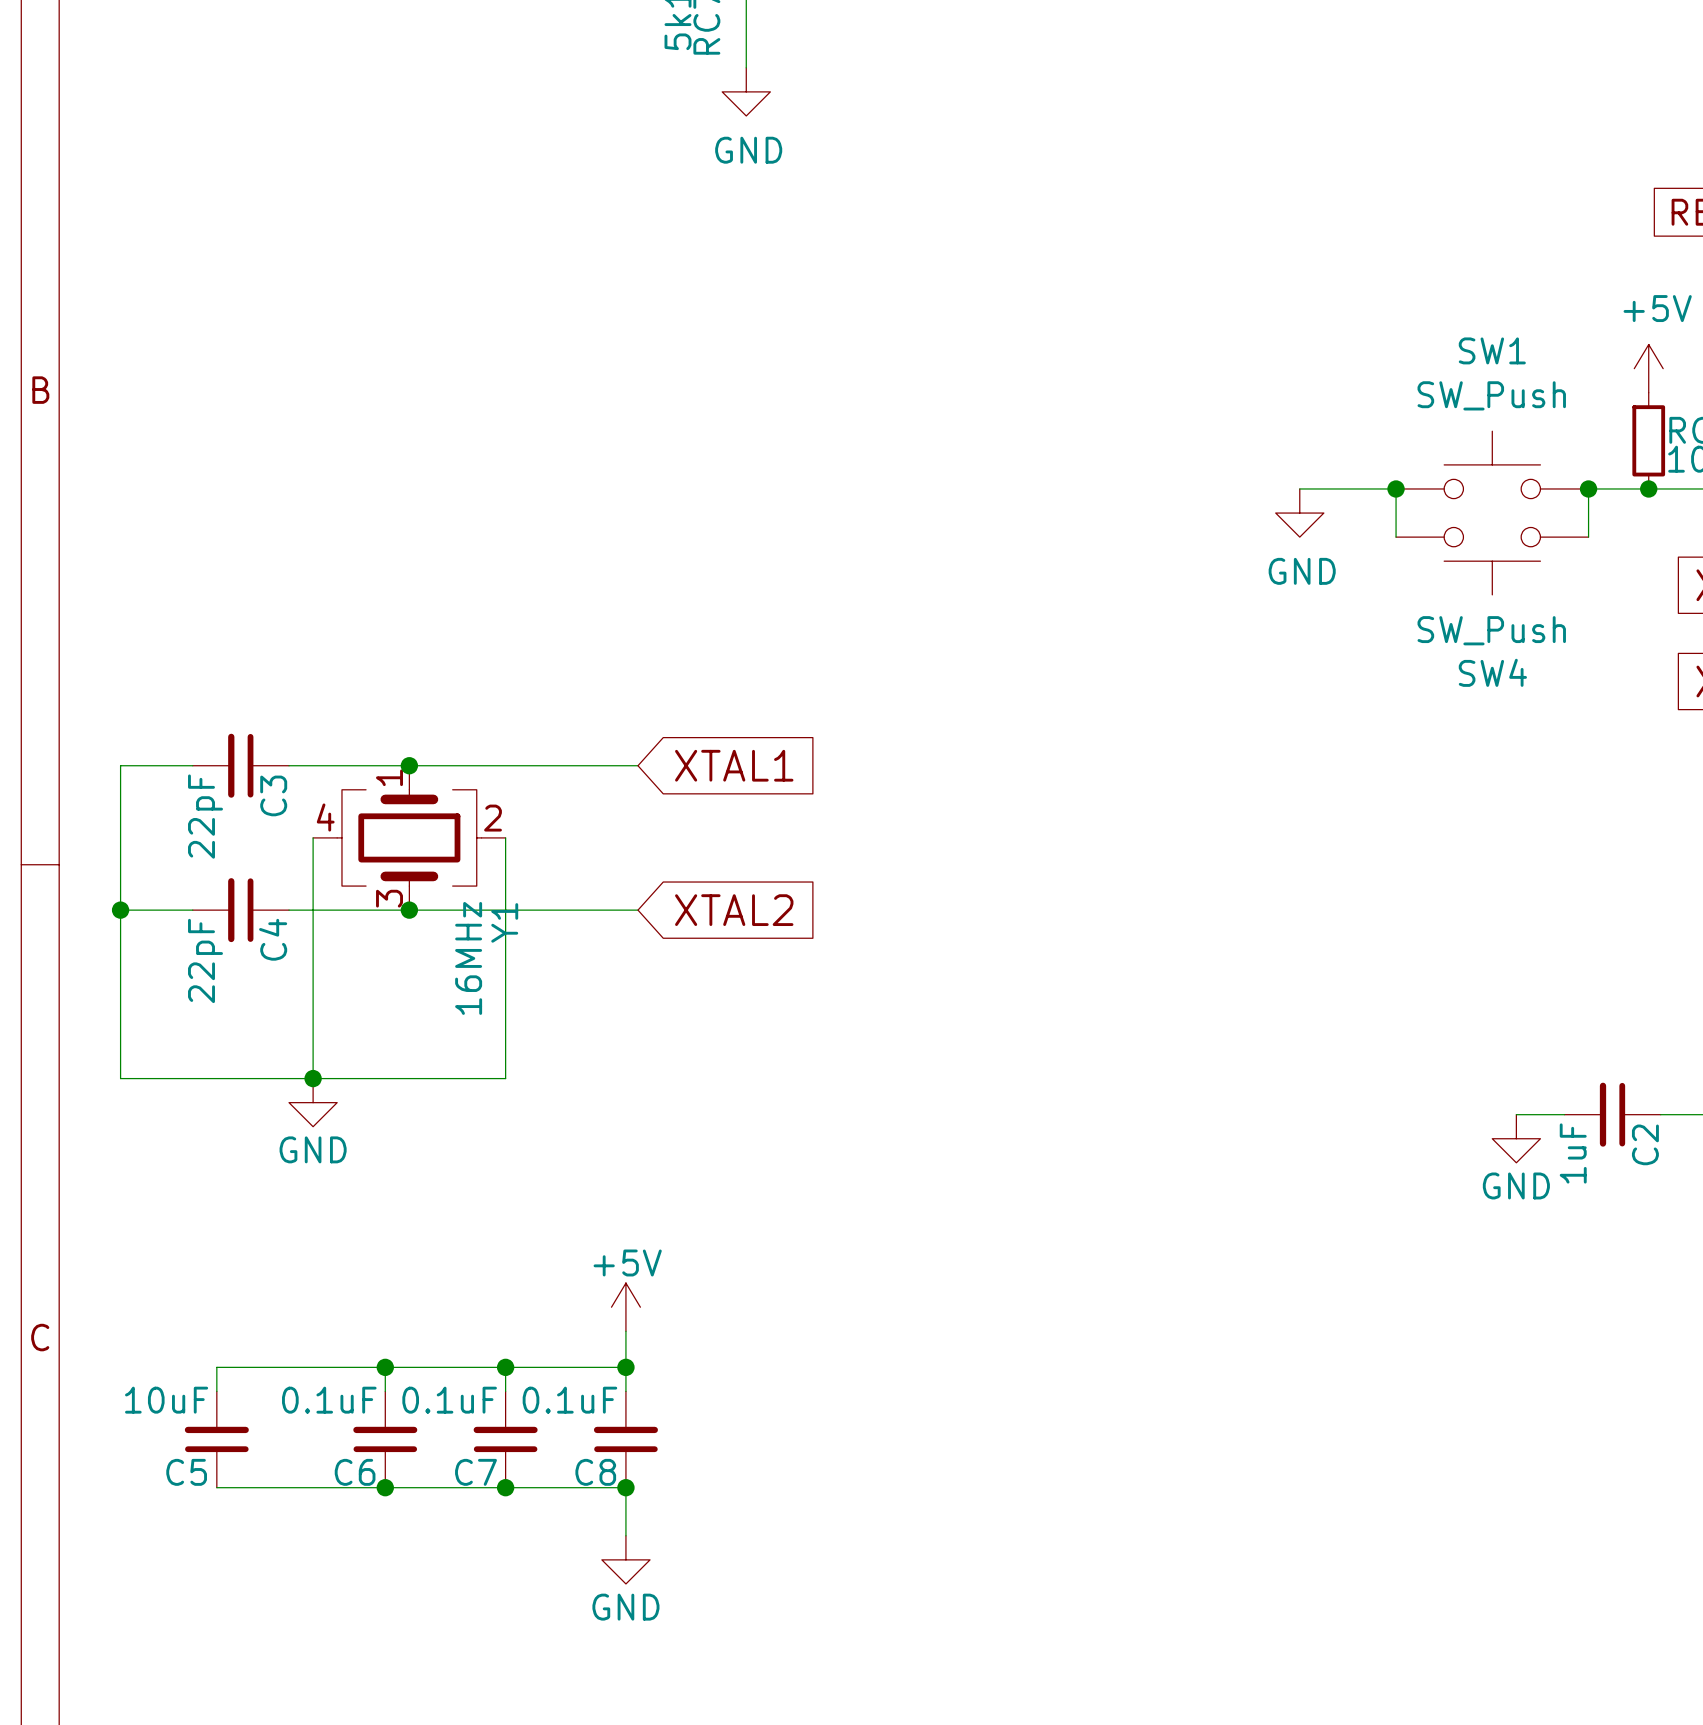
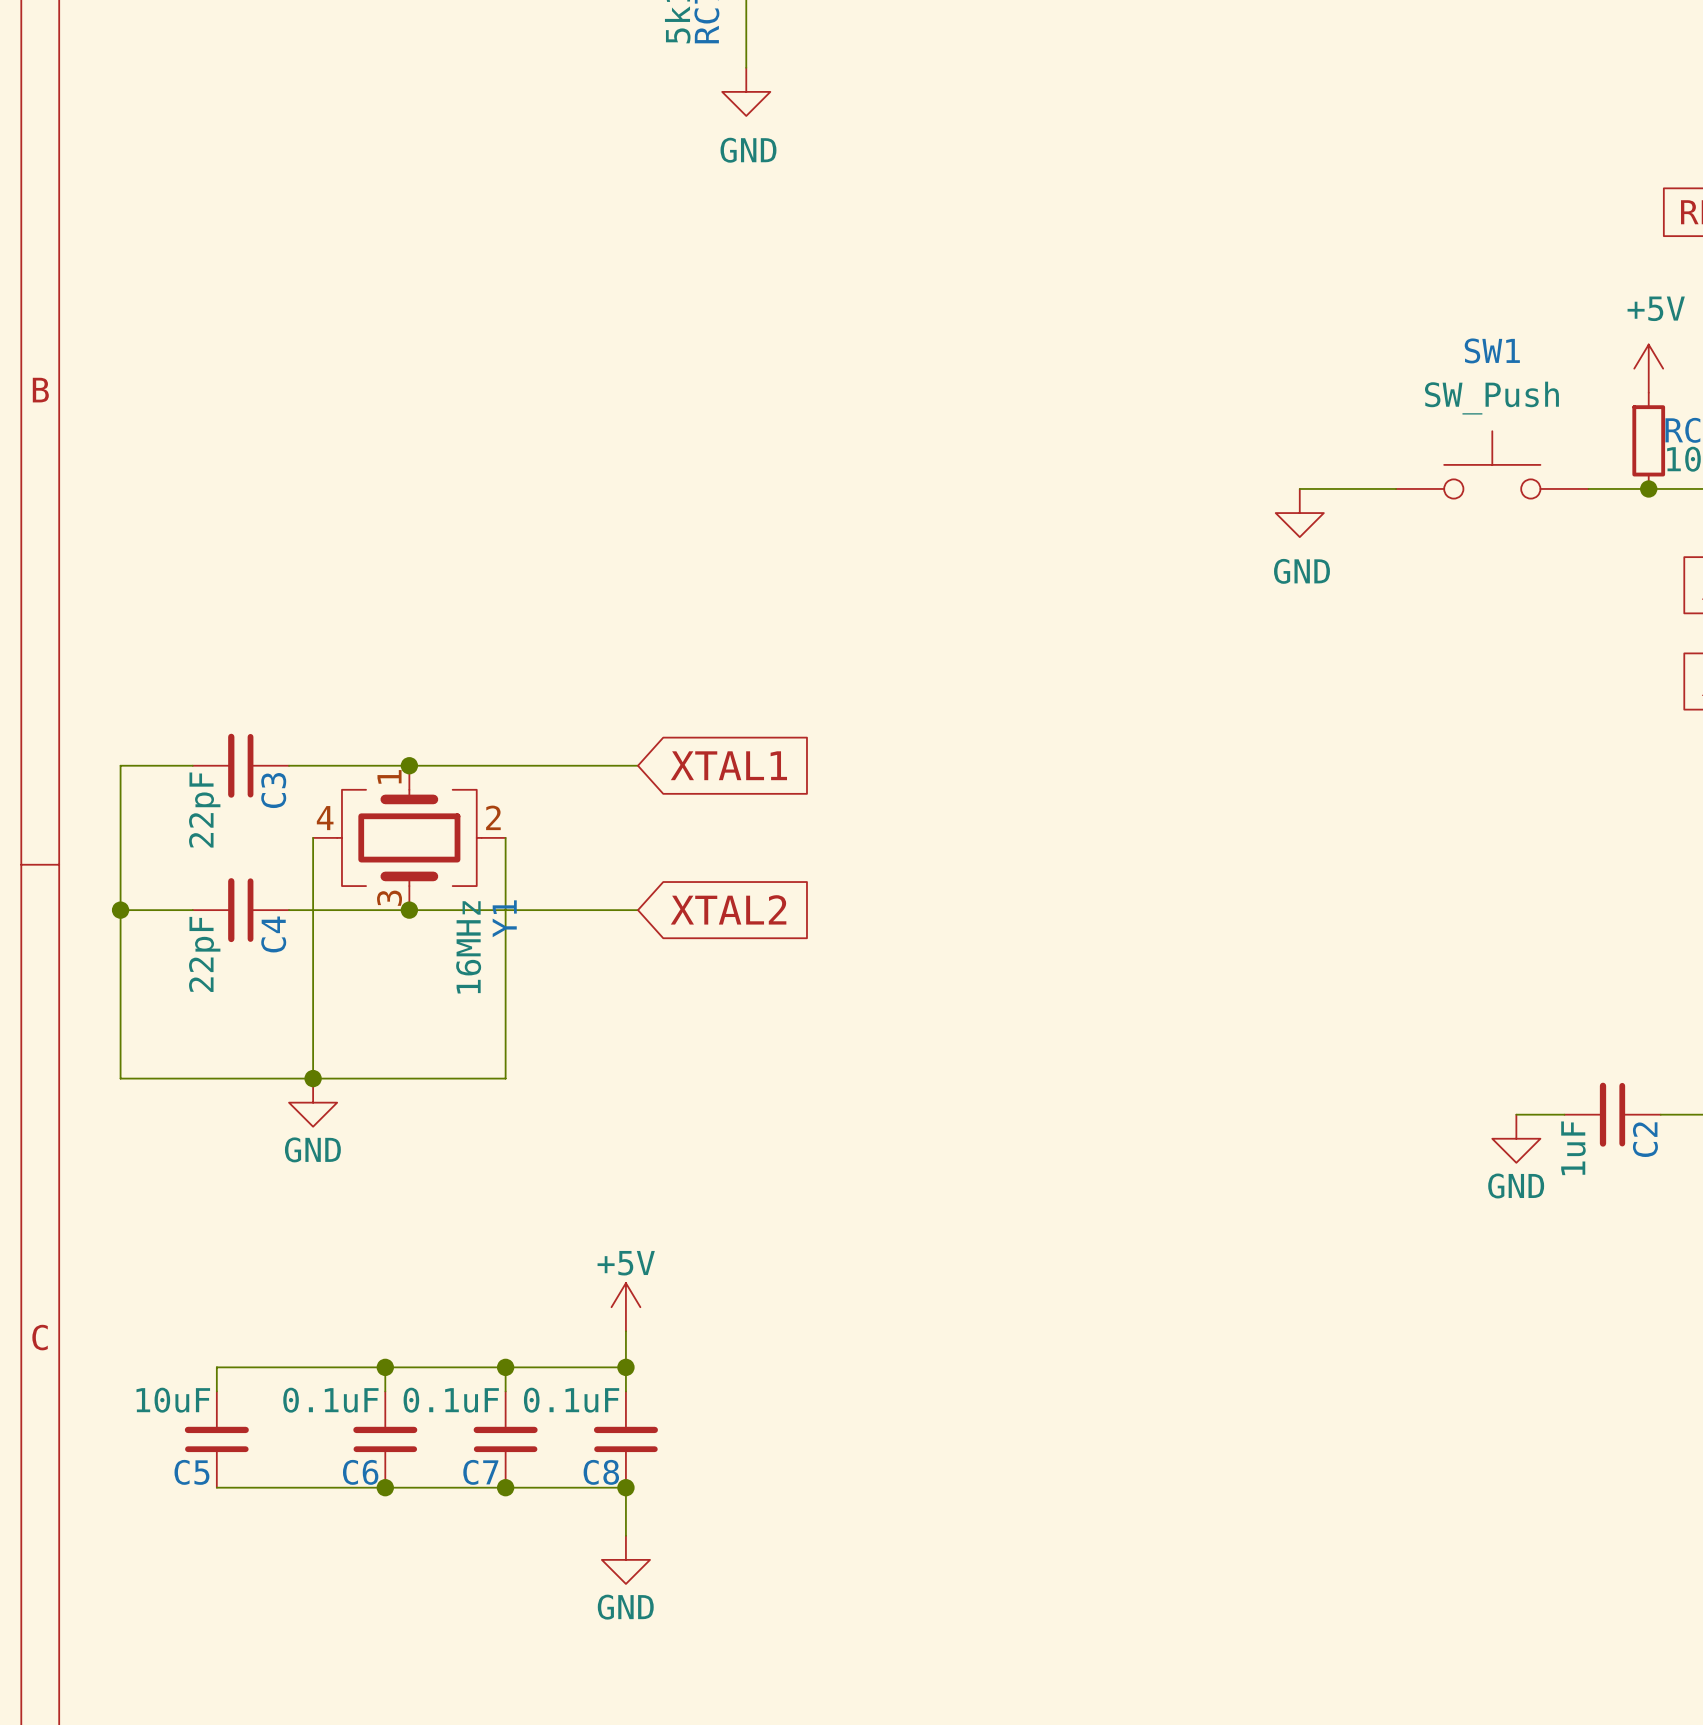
wire: (1396, 488) (1396, 537) -> none
junction: (1396, 488) -> none
wire: (1588, 488) (1588, 537) -> none
junction: (1588, 488) -> none
SW4: SW_Push (1492, 561) -> none

